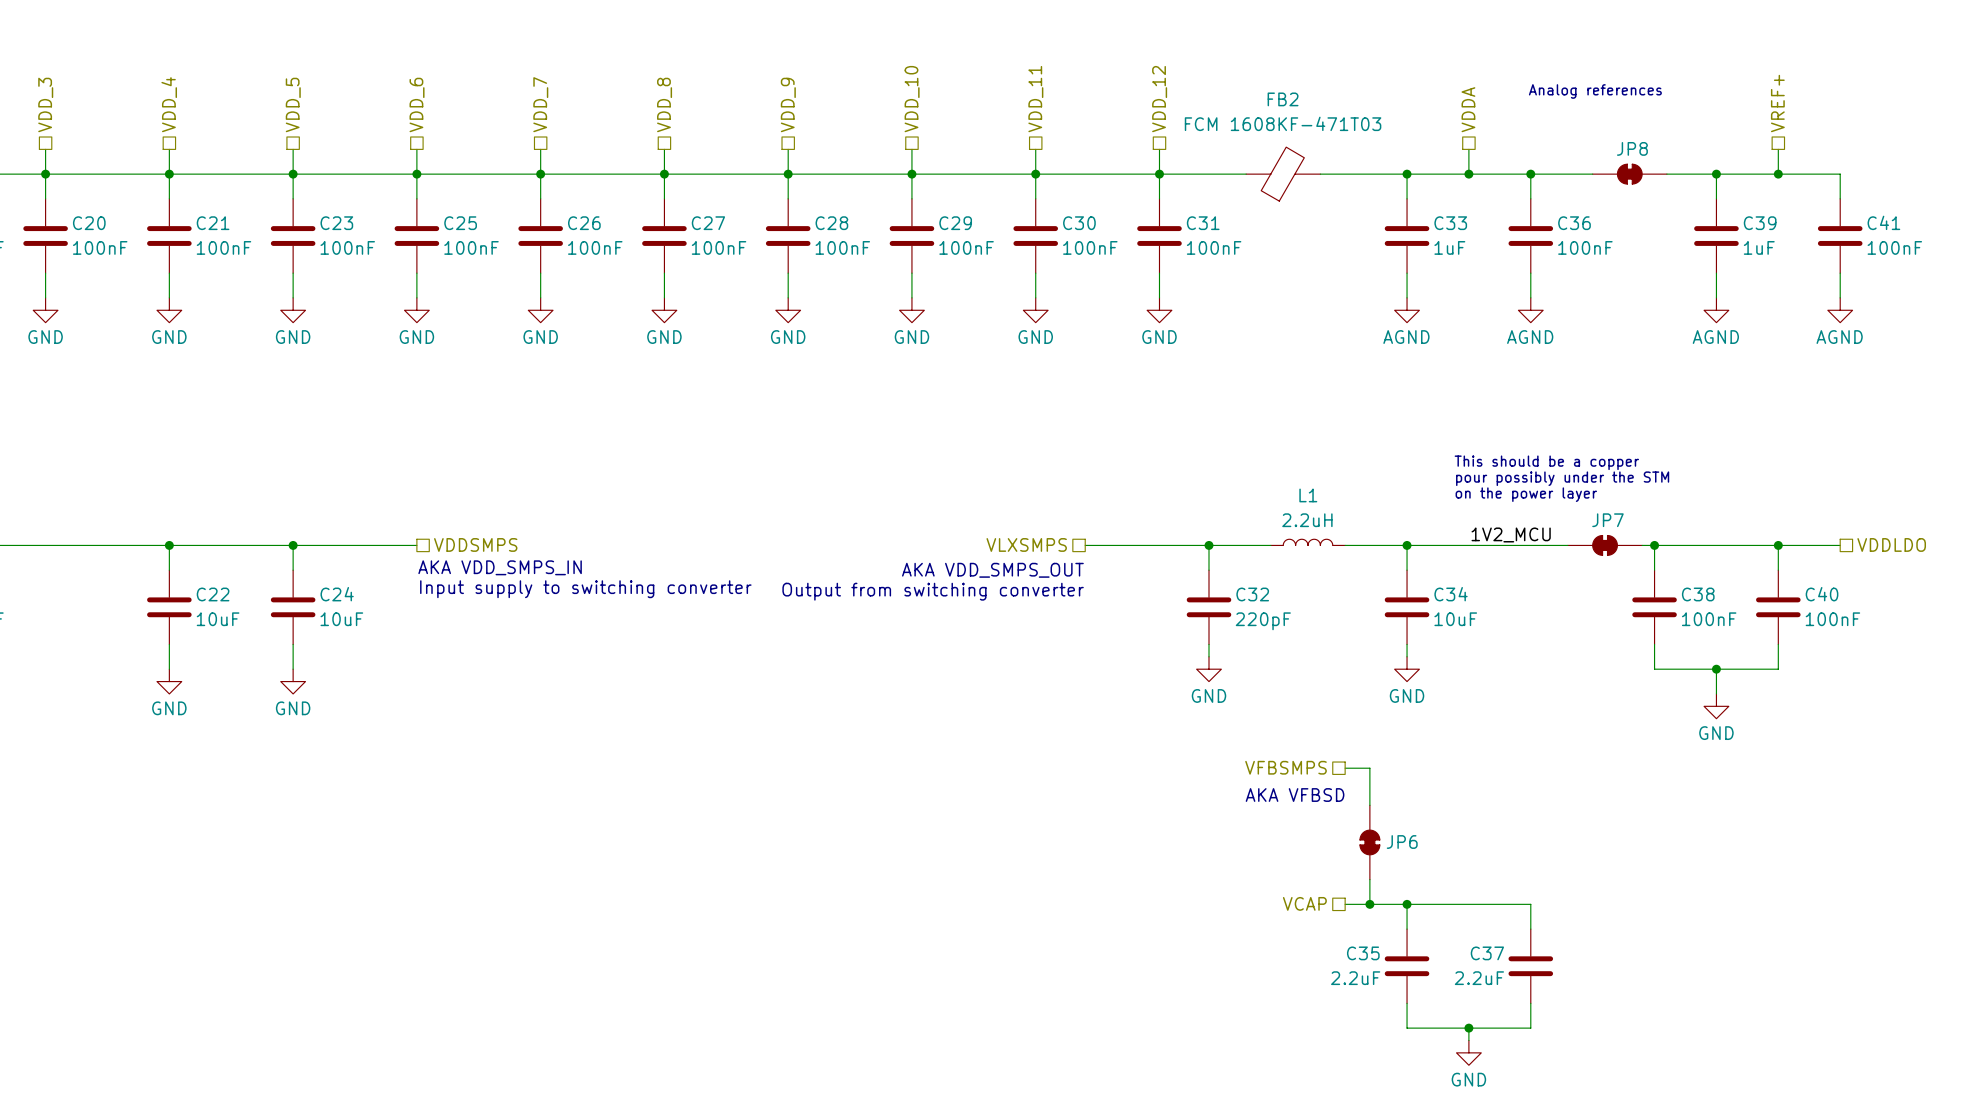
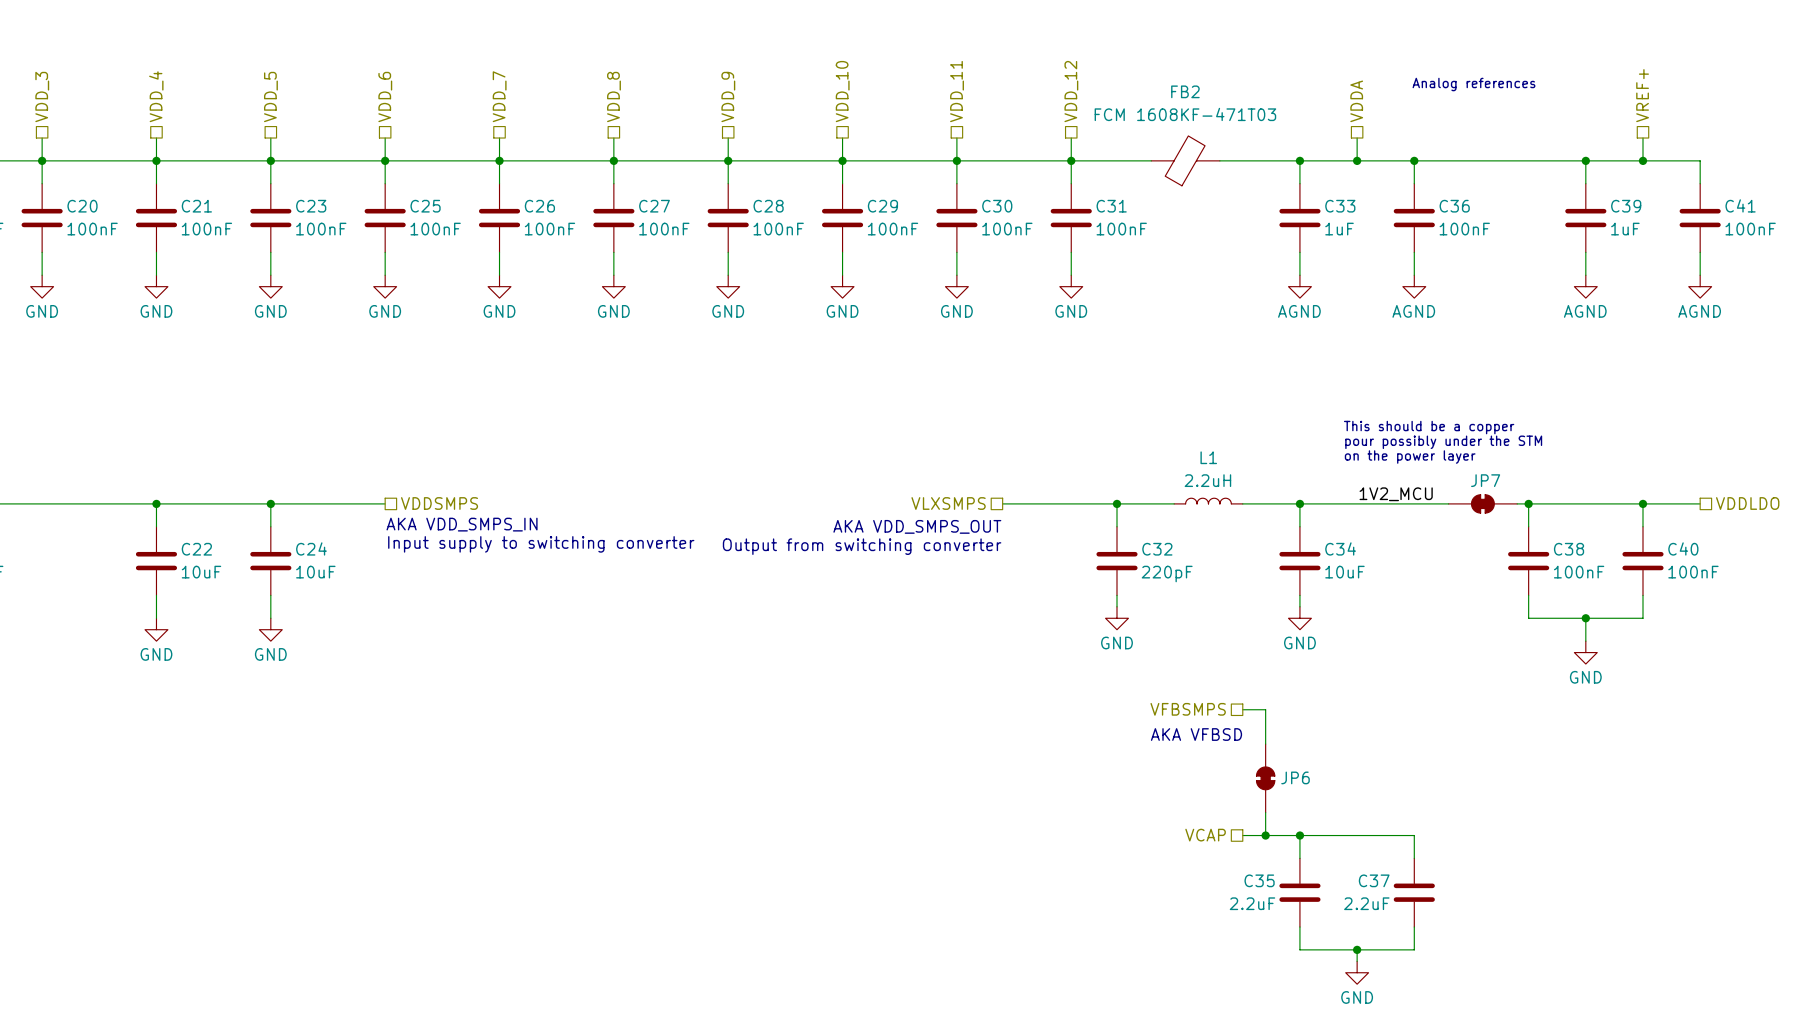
JP8: (1629, 174) -> none

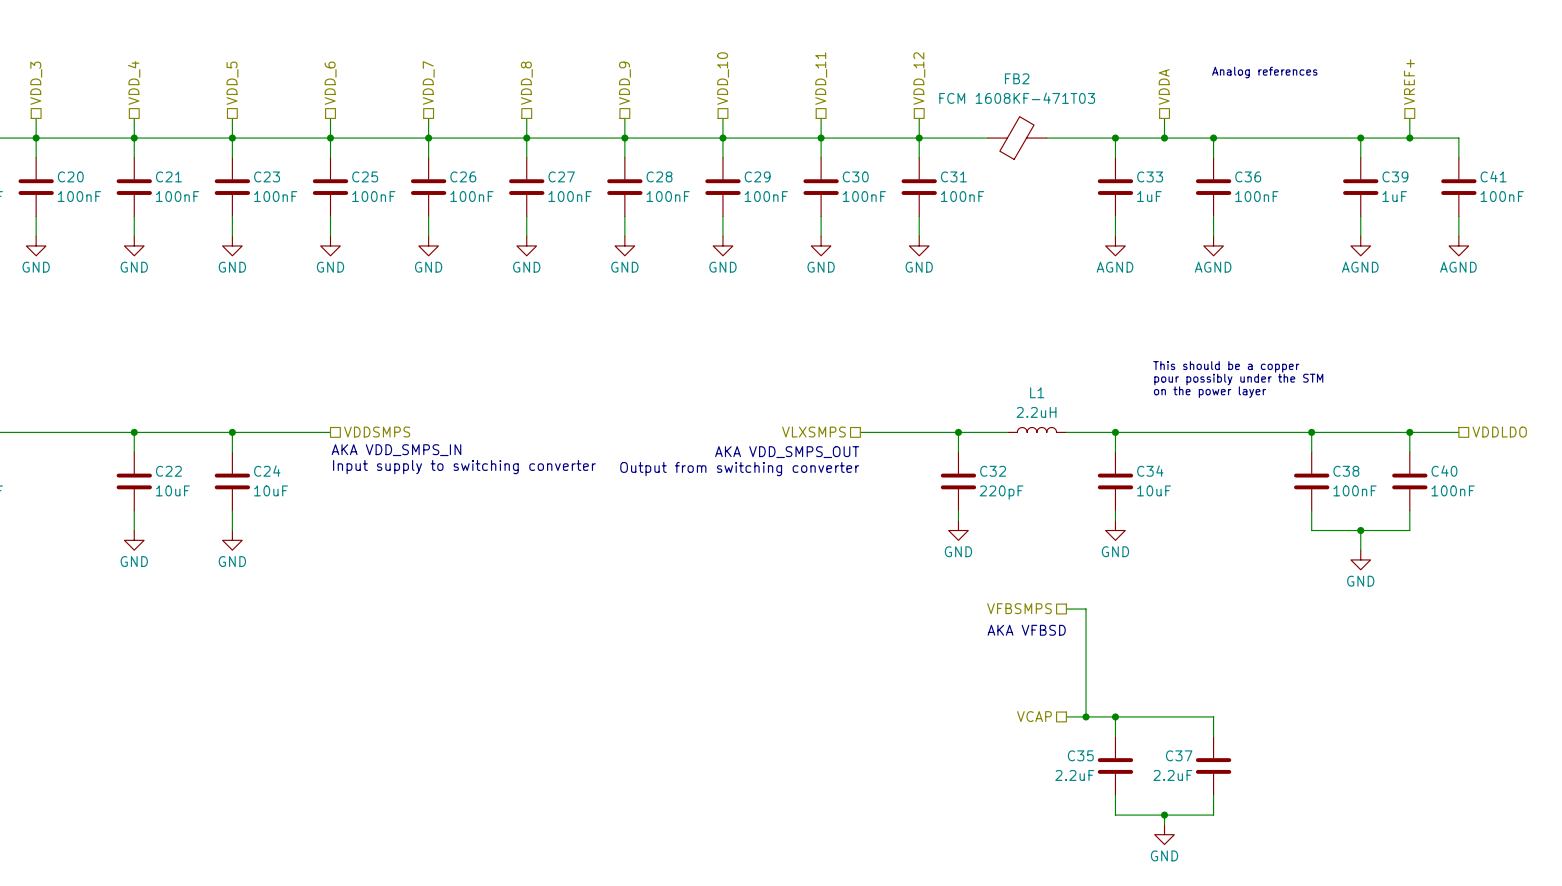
label: 1V2_MCU (1396, 494) -> none
JP7: (1482, 503) -> none
JP6: (1265, 778) -> none

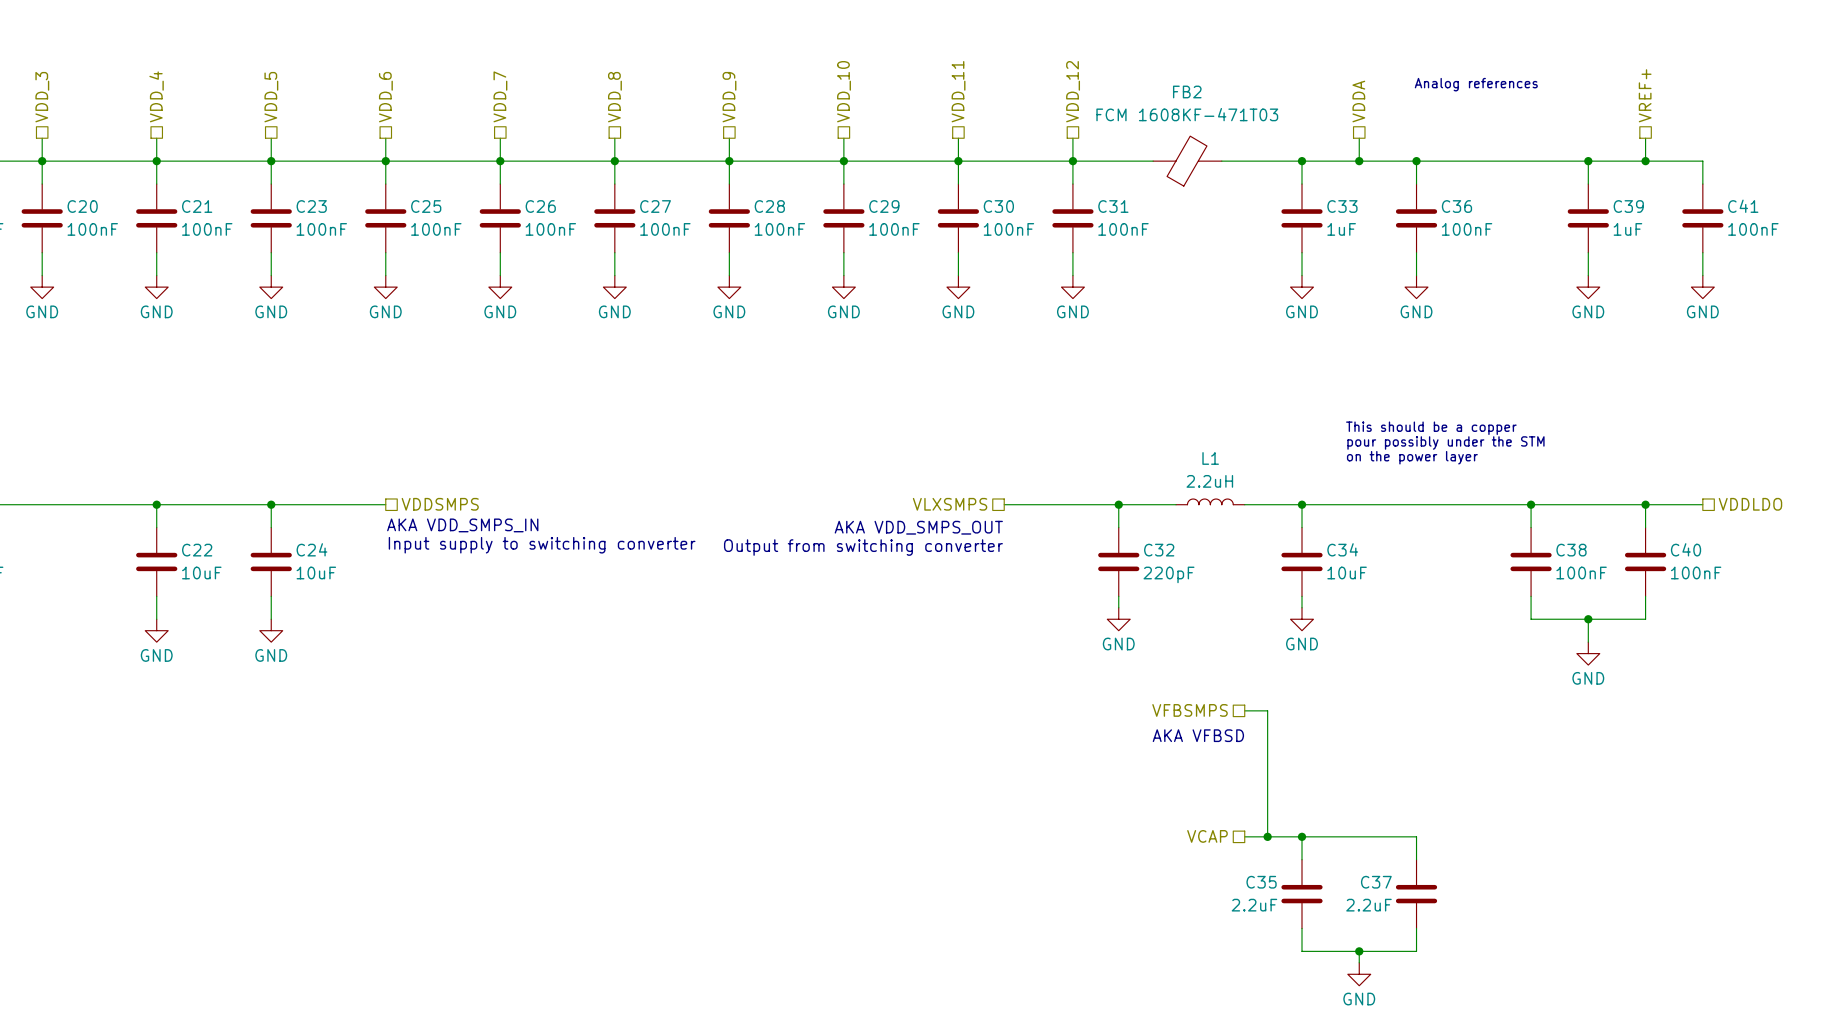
power symbol: AGND (1115, 245) -> GND (1301, 287)
power symbol: AGND (1213, 245) -> GND (1416, 287)
power symbol: AGND (1360, 245) -> GND (1588, 287)
power symbol: AGND (1458, 245) -> GND (1702, 287)

